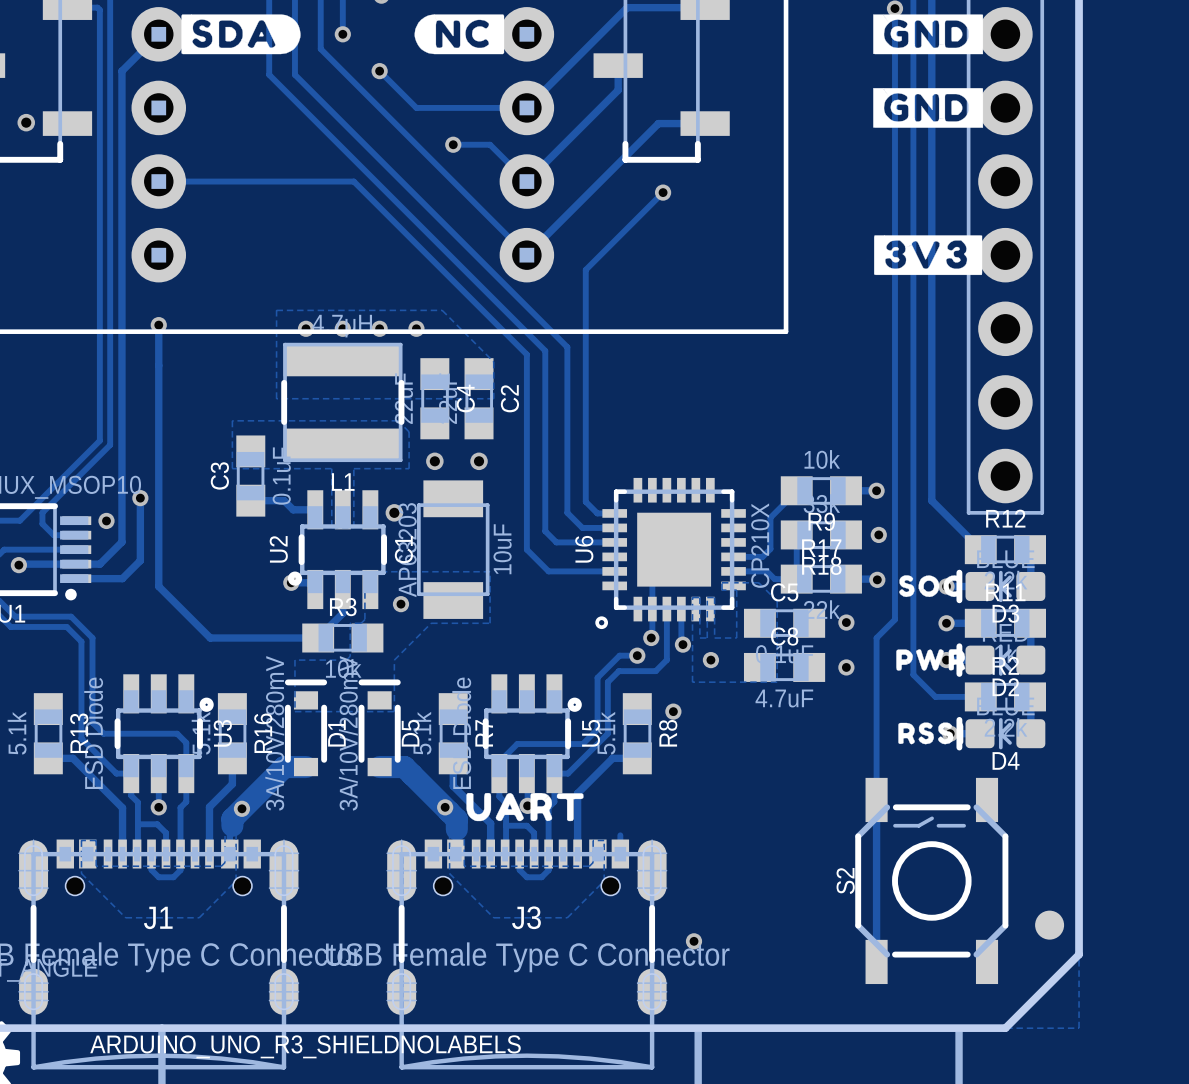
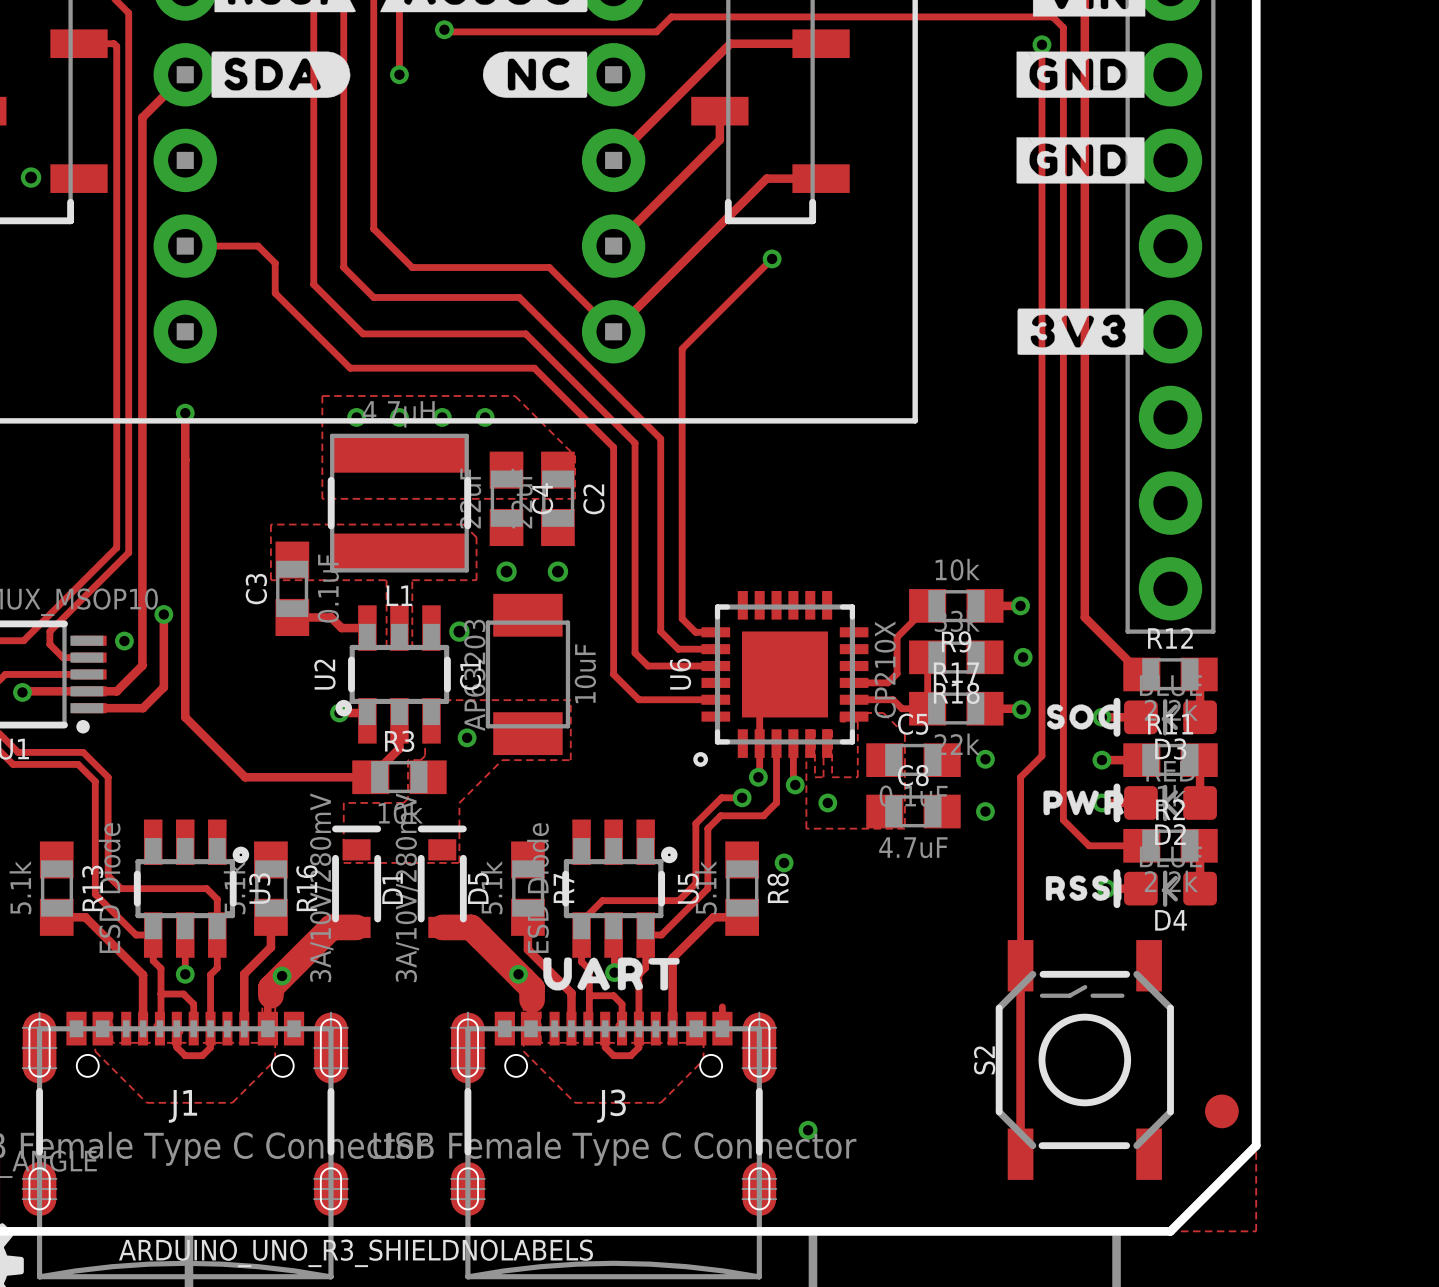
track: (320, 49) (471, 199) -> (373, 91) (373, 228) (412, 267) (549, 267)
track: (379, 71) (416, 107) (526, 107) -> none
via: (379, 71) -> none
track: (269, 74) (451, 257) -> (313, 121) (313, 284) (363, 333) (525, 333)
track: (294, 74) (445, 225) -> (343, 121) (343, 267) (373, 297) (519, 297)
track: (453, 144) (490, 144) (526, 181) -> none
via: (453, 144) -> none
track: (221, 181) (353, 181) (458, 286) -> (258, 246) (275, 263) (275, 293) (350, 368) (534, 368)

